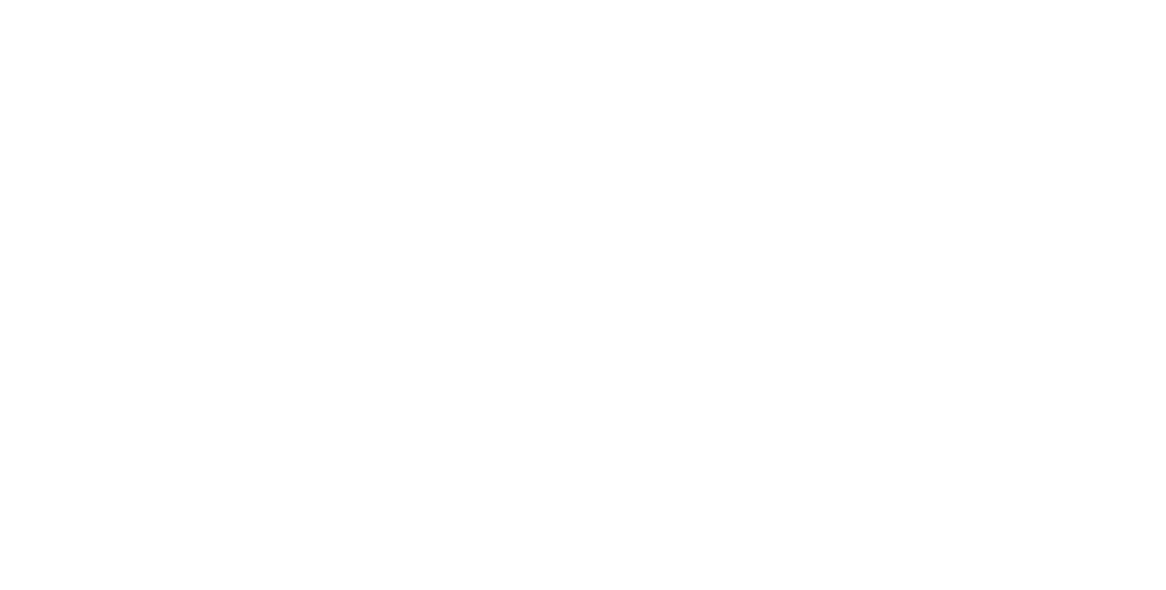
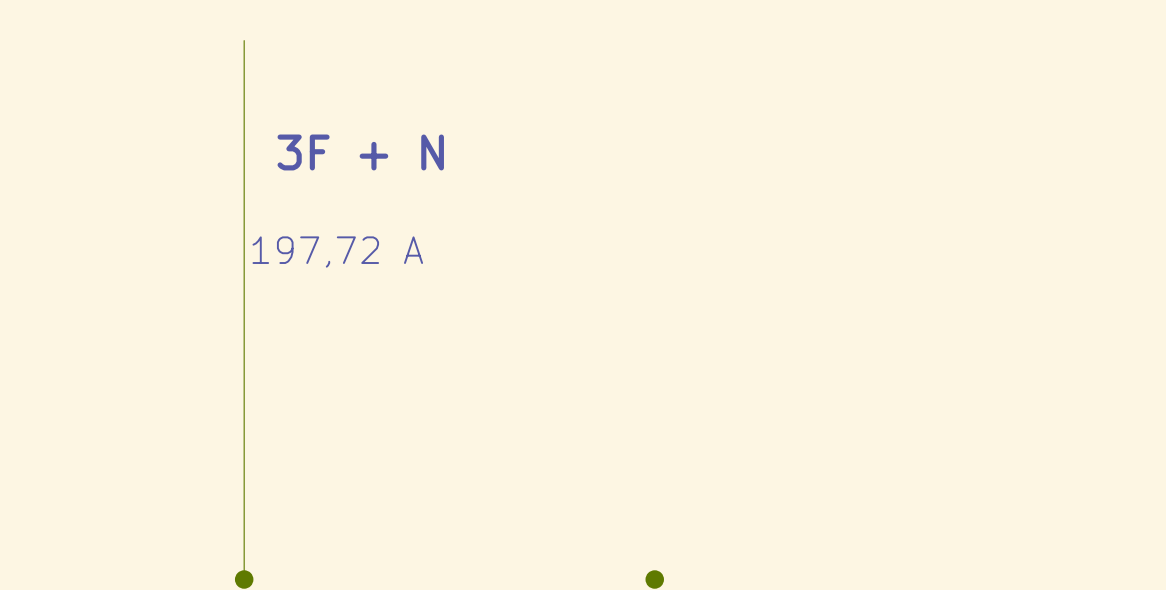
wire: none -> (244, 40) (244, 579)
text: none -> 3F + N (360, 152)
text: none -> 197,72 A (337, 252)
junction: none -> (244, 579)
junction: none -> (654, 579)

